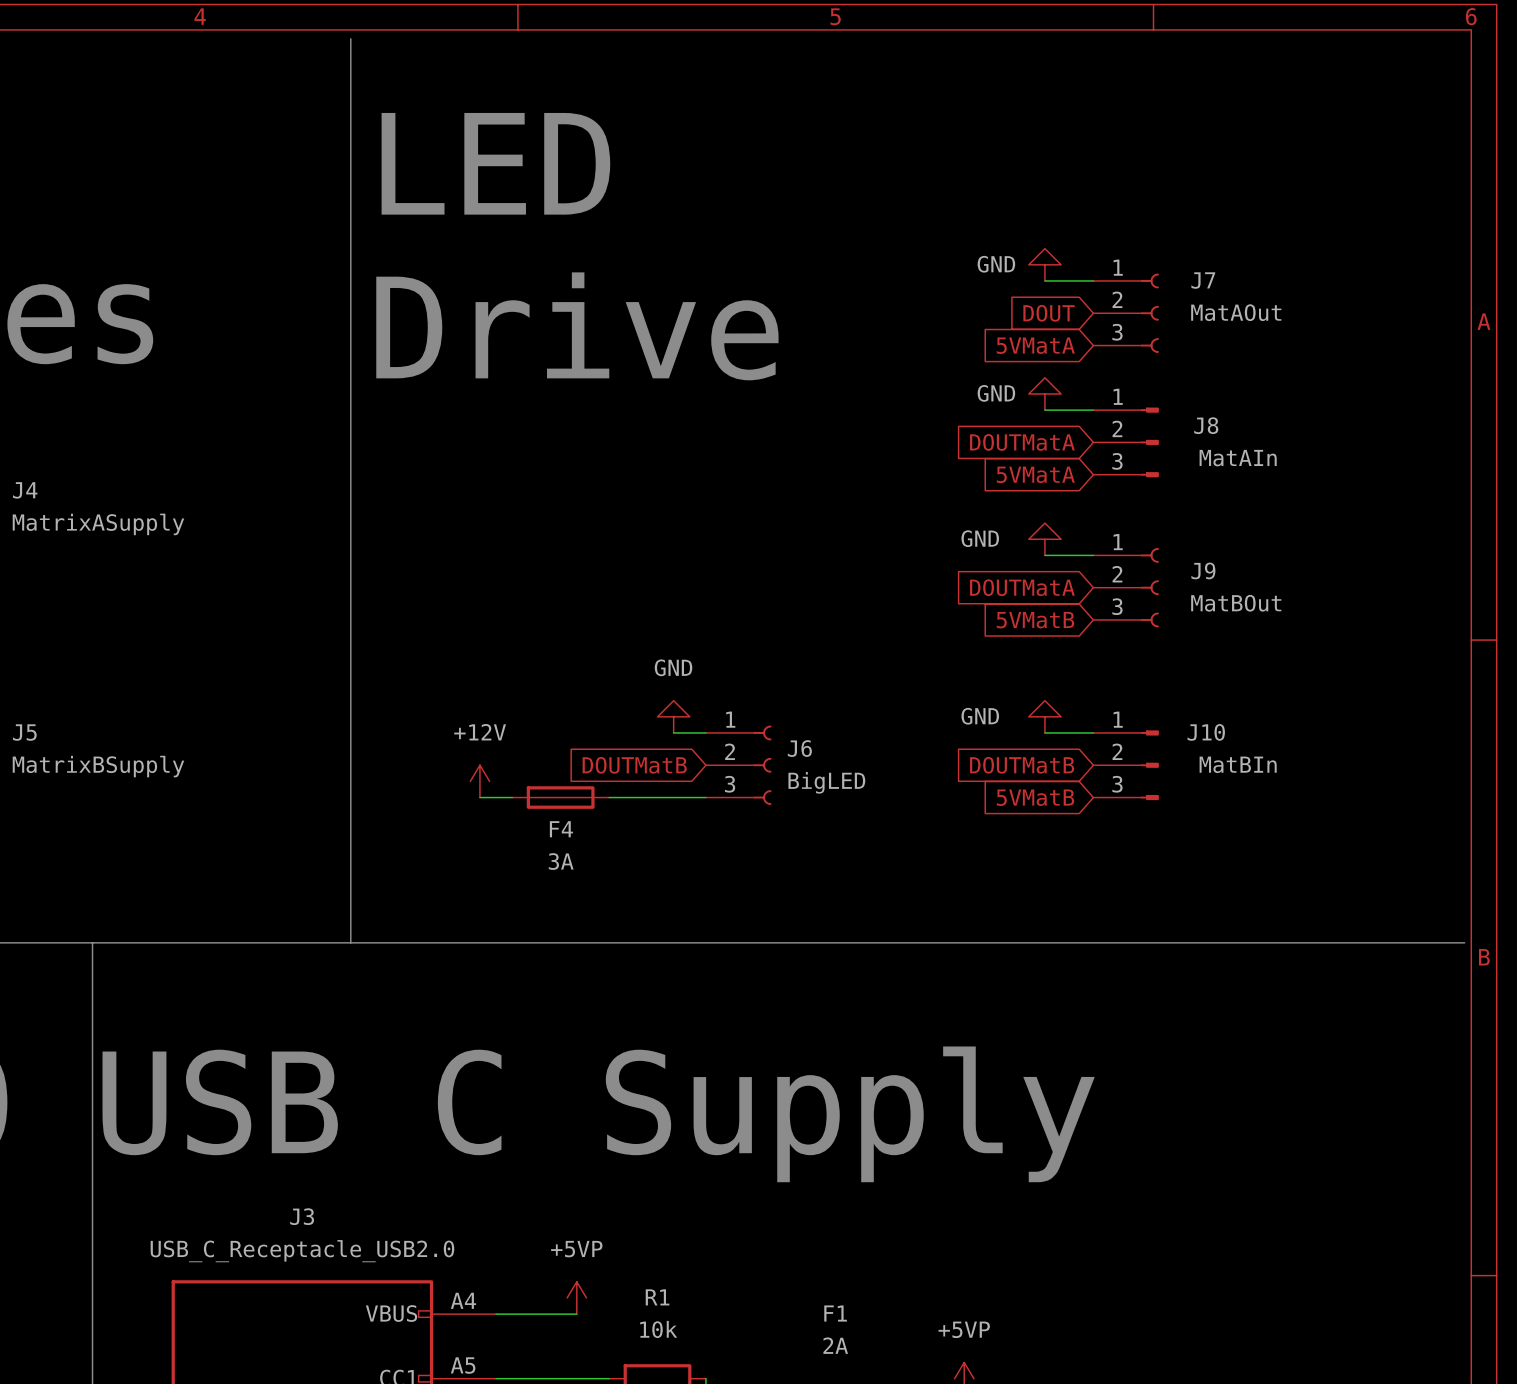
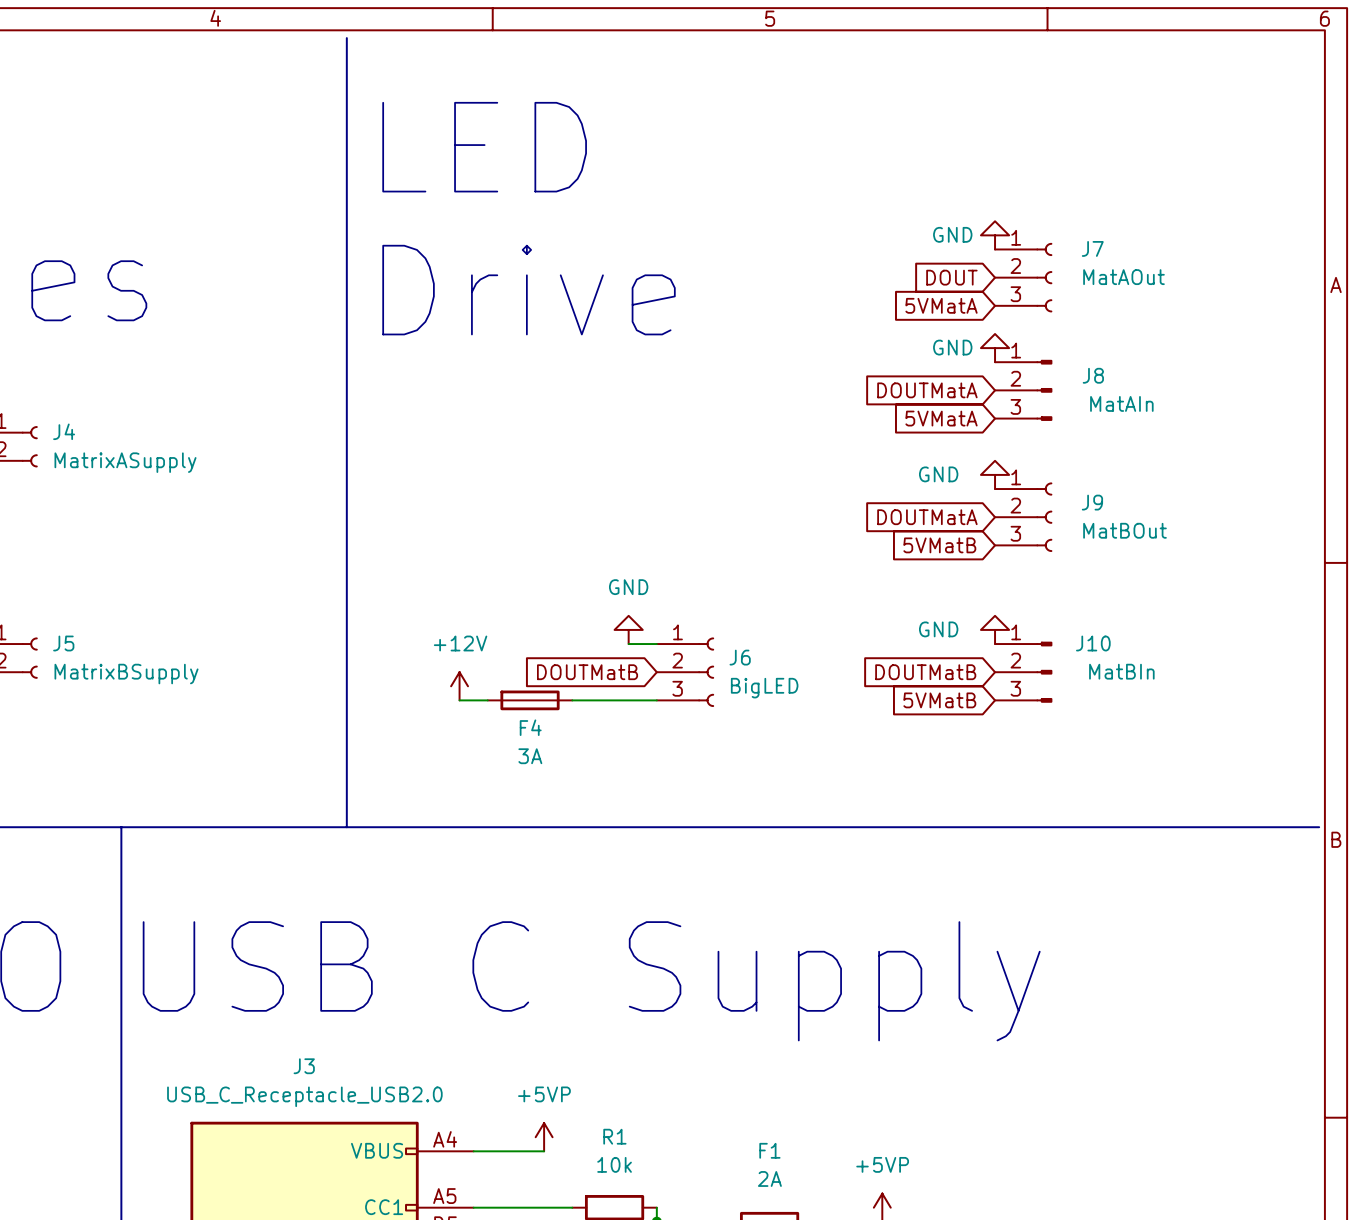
power symbol position: GND (1044, 264) -> GND (995, 235)
wire: (1044, 280) (1093, 280) -> none
power symbol position: GND (1044, 393) -> GND (995, 348)
wire: (1044, 410) (1093, 410) -> none
power symbol position: GND (1044, 539) -> GND (995, 474)
wire: (1044, 555) (1093, 555) -> none
power symbol position: GND (1044, 716) -> GND (995, 629)
wire: (1044, 732) (1093, 732) -> none

